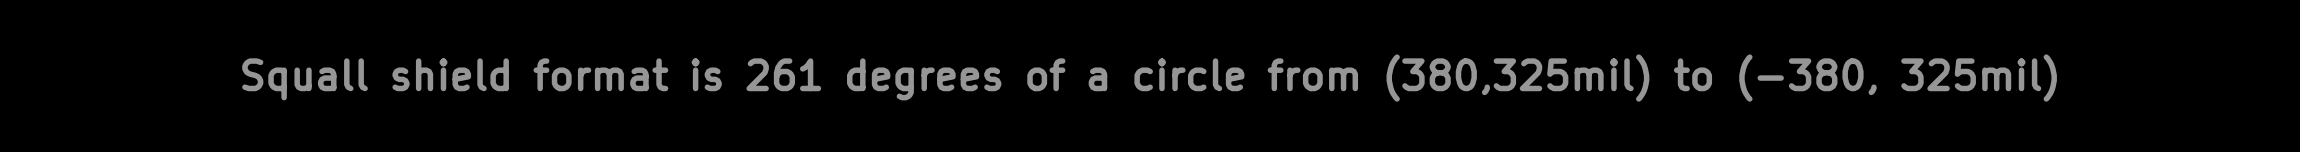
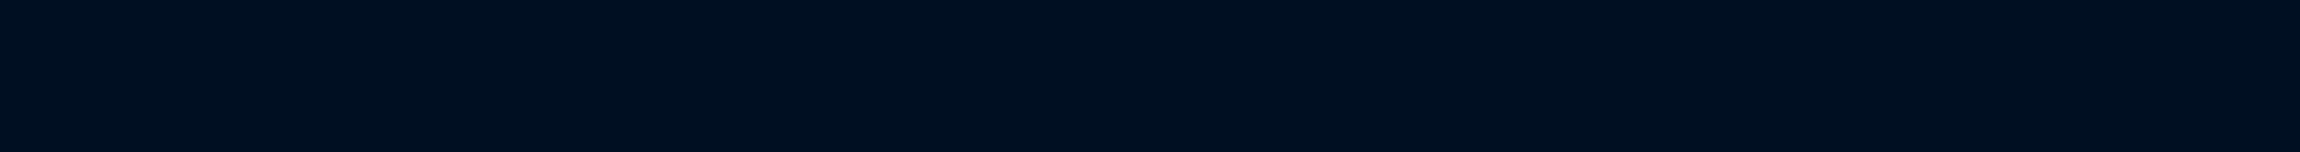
text: Squall shield format is 261 degrees of a circle from (380,325mil) to (-380, 325mil) (1149, 78) -> none

